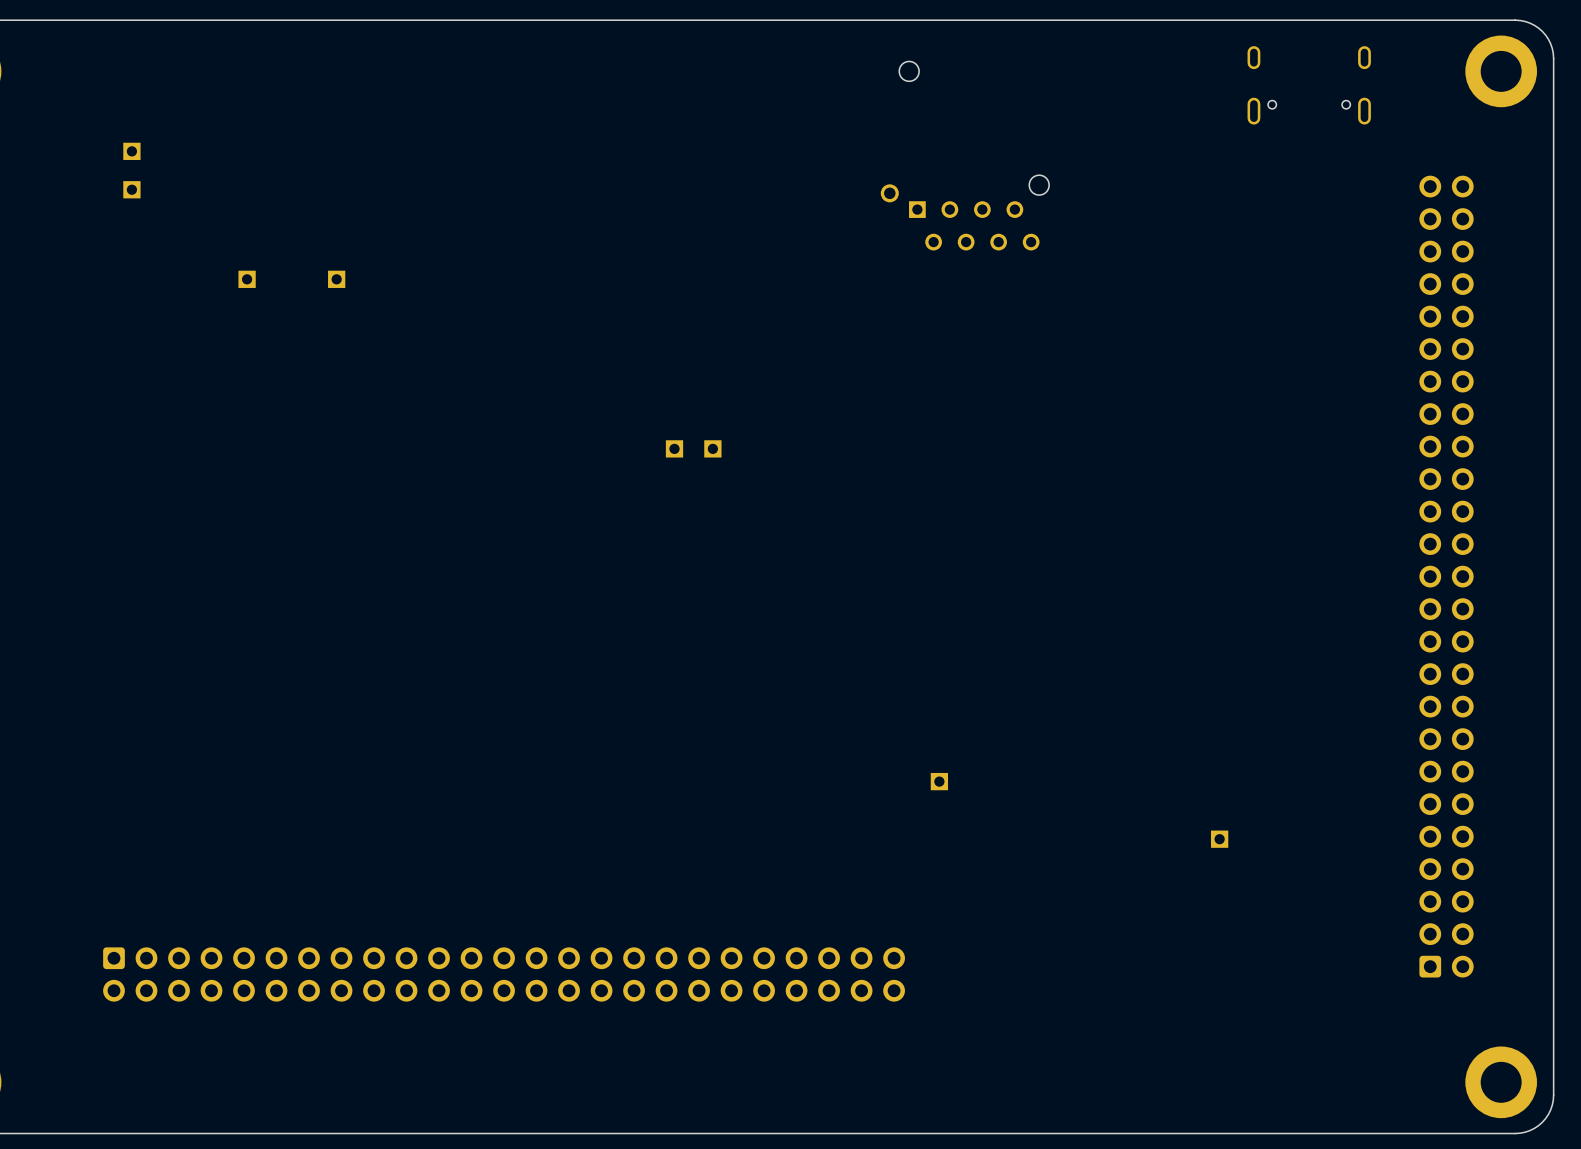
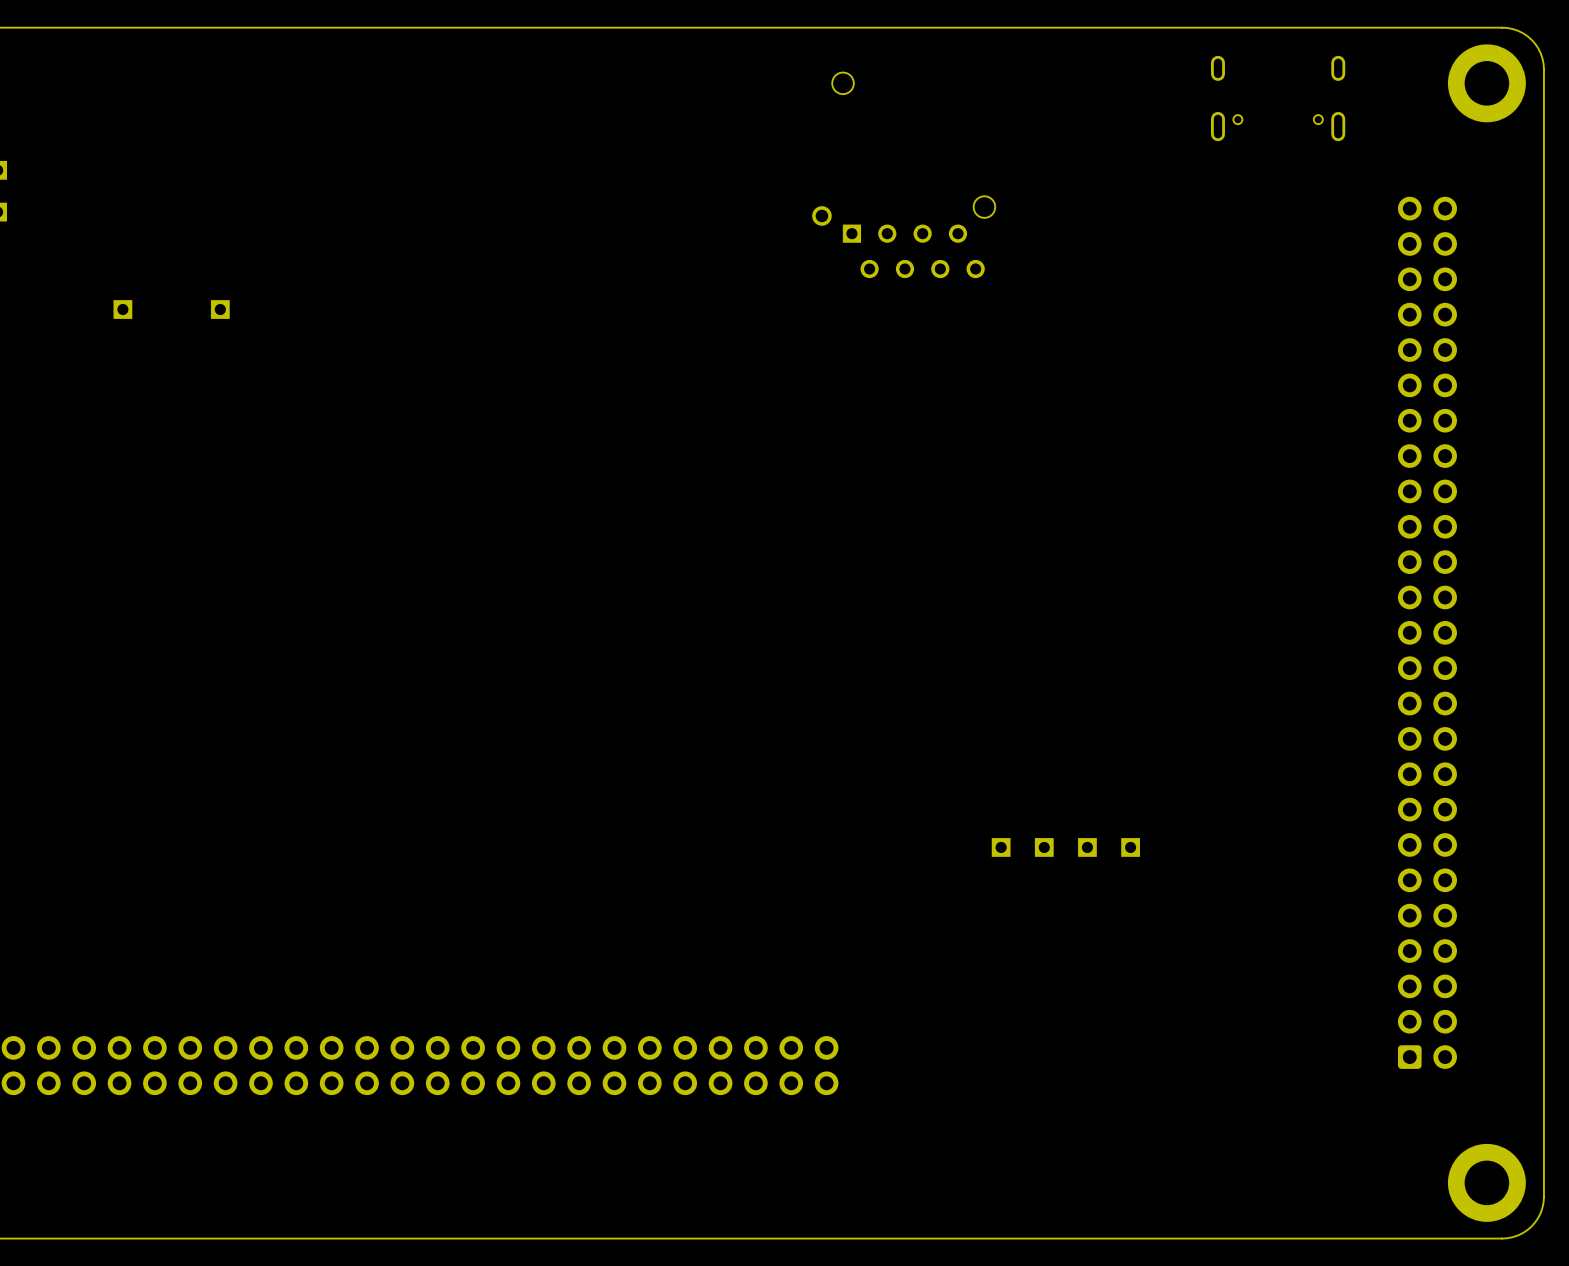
part: (674, 448) -> none
part: (712, 448) -> none
part: none -> (1001, 847)
part: none -> (1044, 847)
part: none -> (1087, 847)
part: none -> (1130, 847)
part: (939, 781) -> none
part: (1219, 839) -> none

